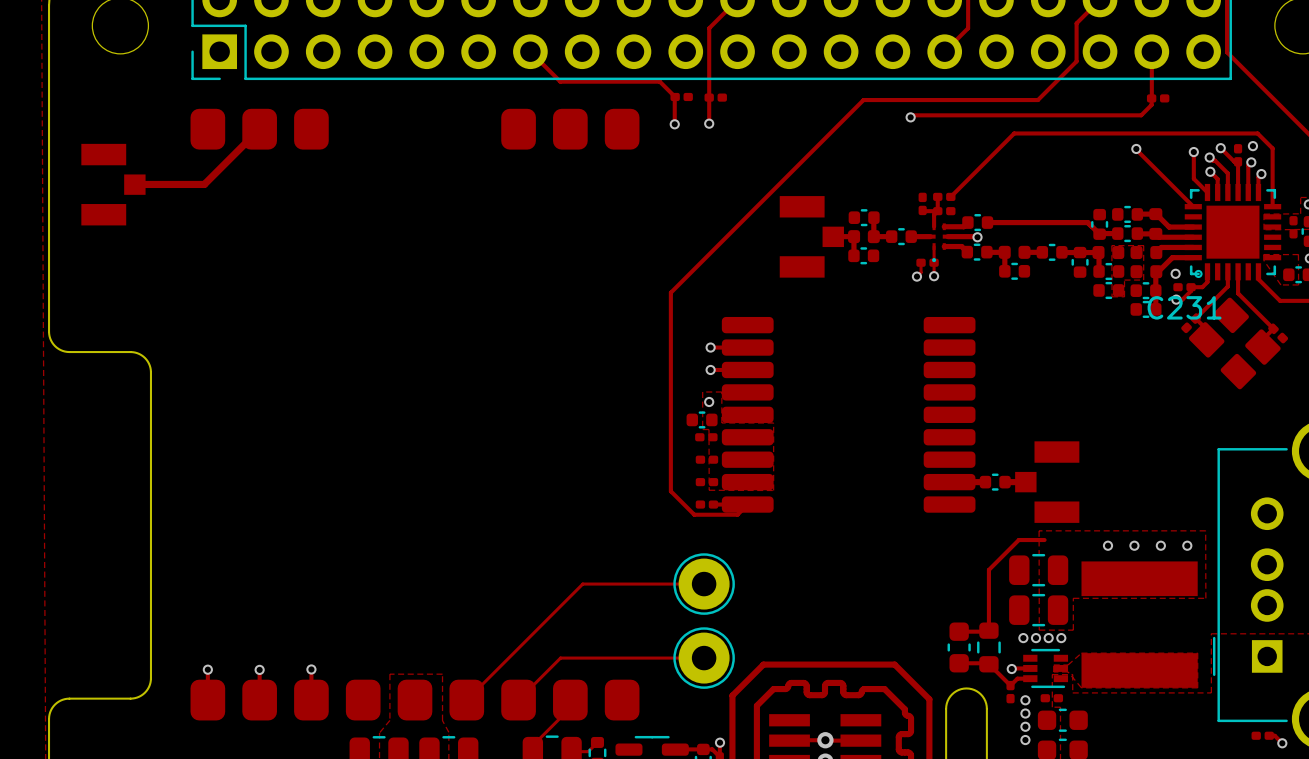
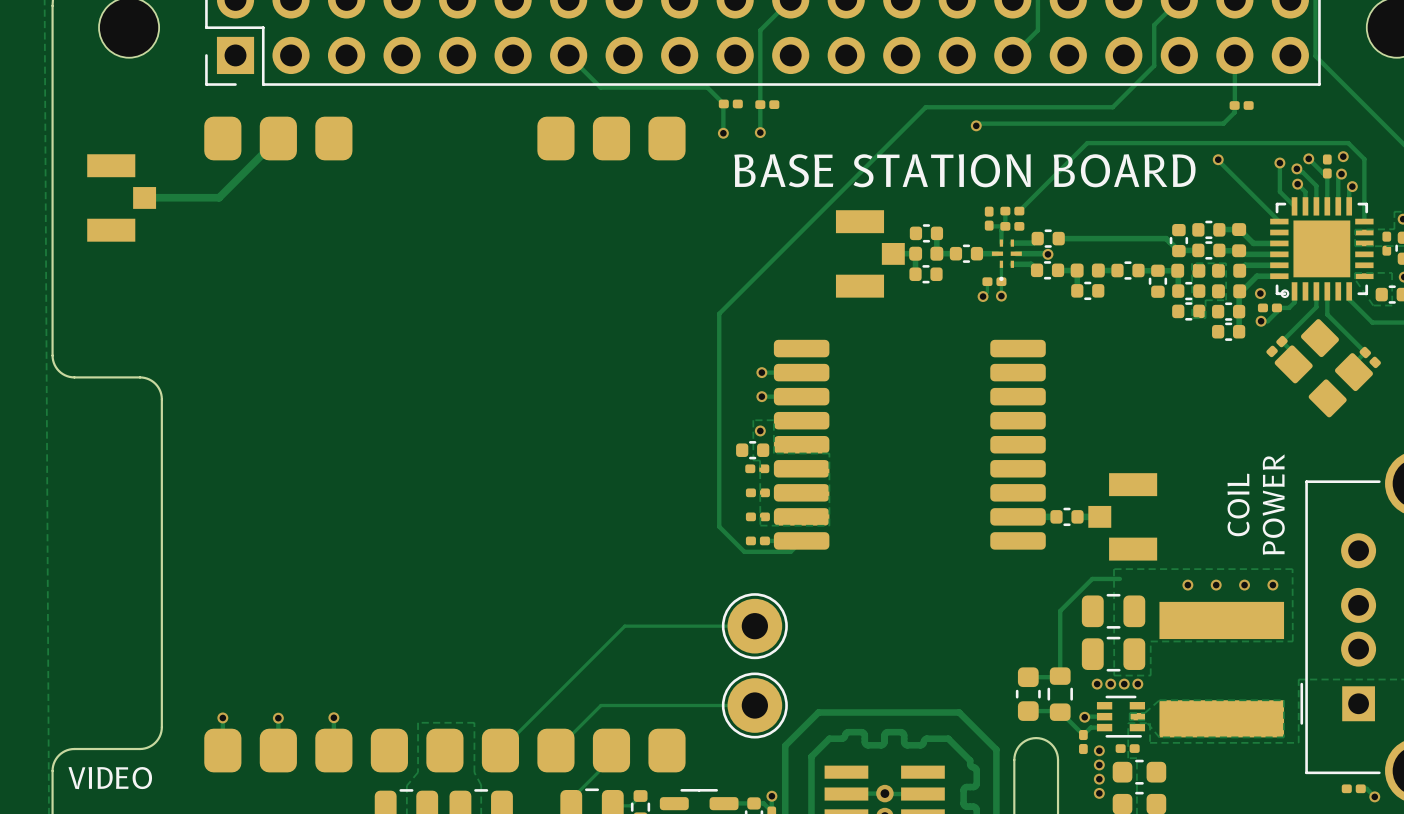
text: none -> BASE STATION BOARD (964, 170)
C231 name: C231 (1184, 307) -> none
text: none -> COIL (1238, 504)
text: none -> POWER (1273, 504)
text: none -> VIDEO (110, 778)

